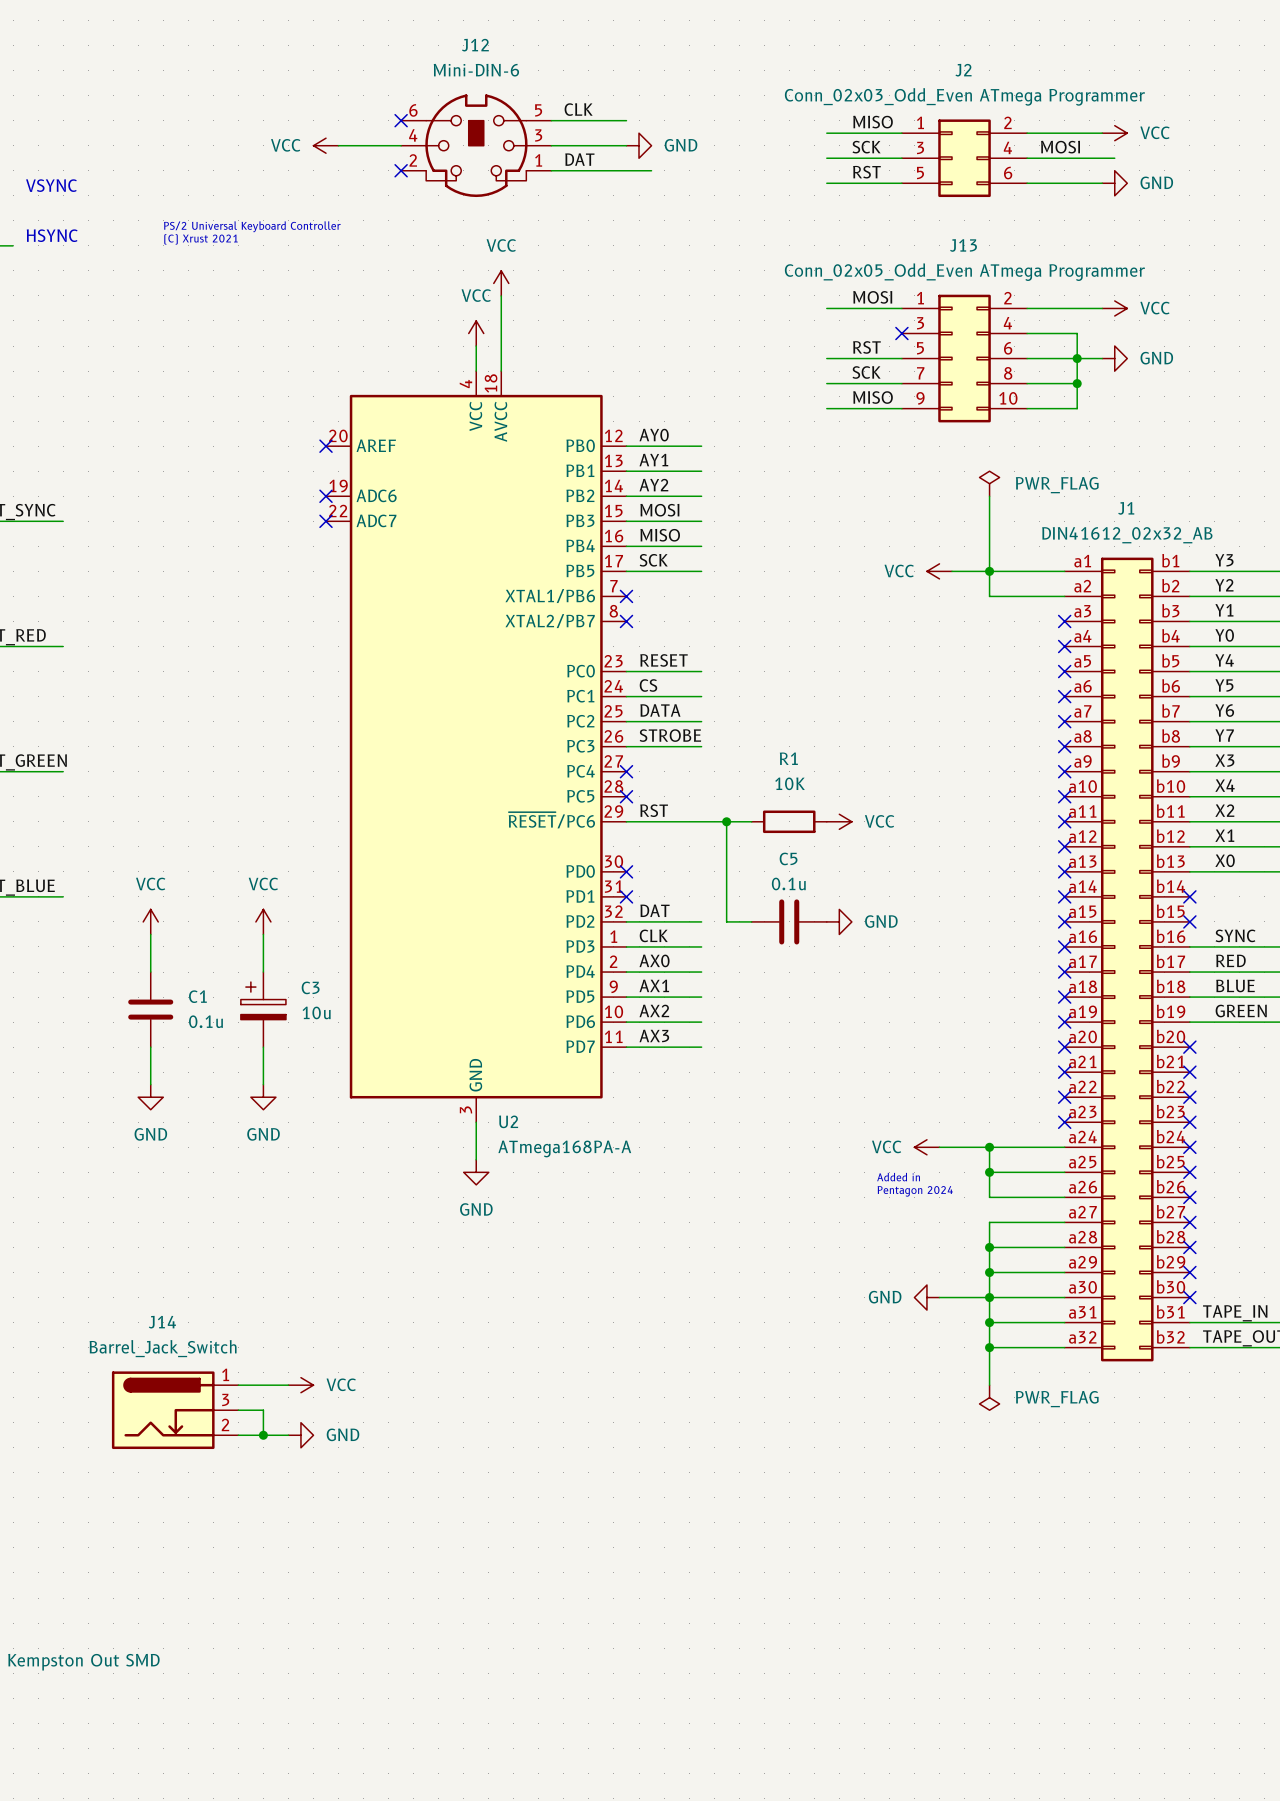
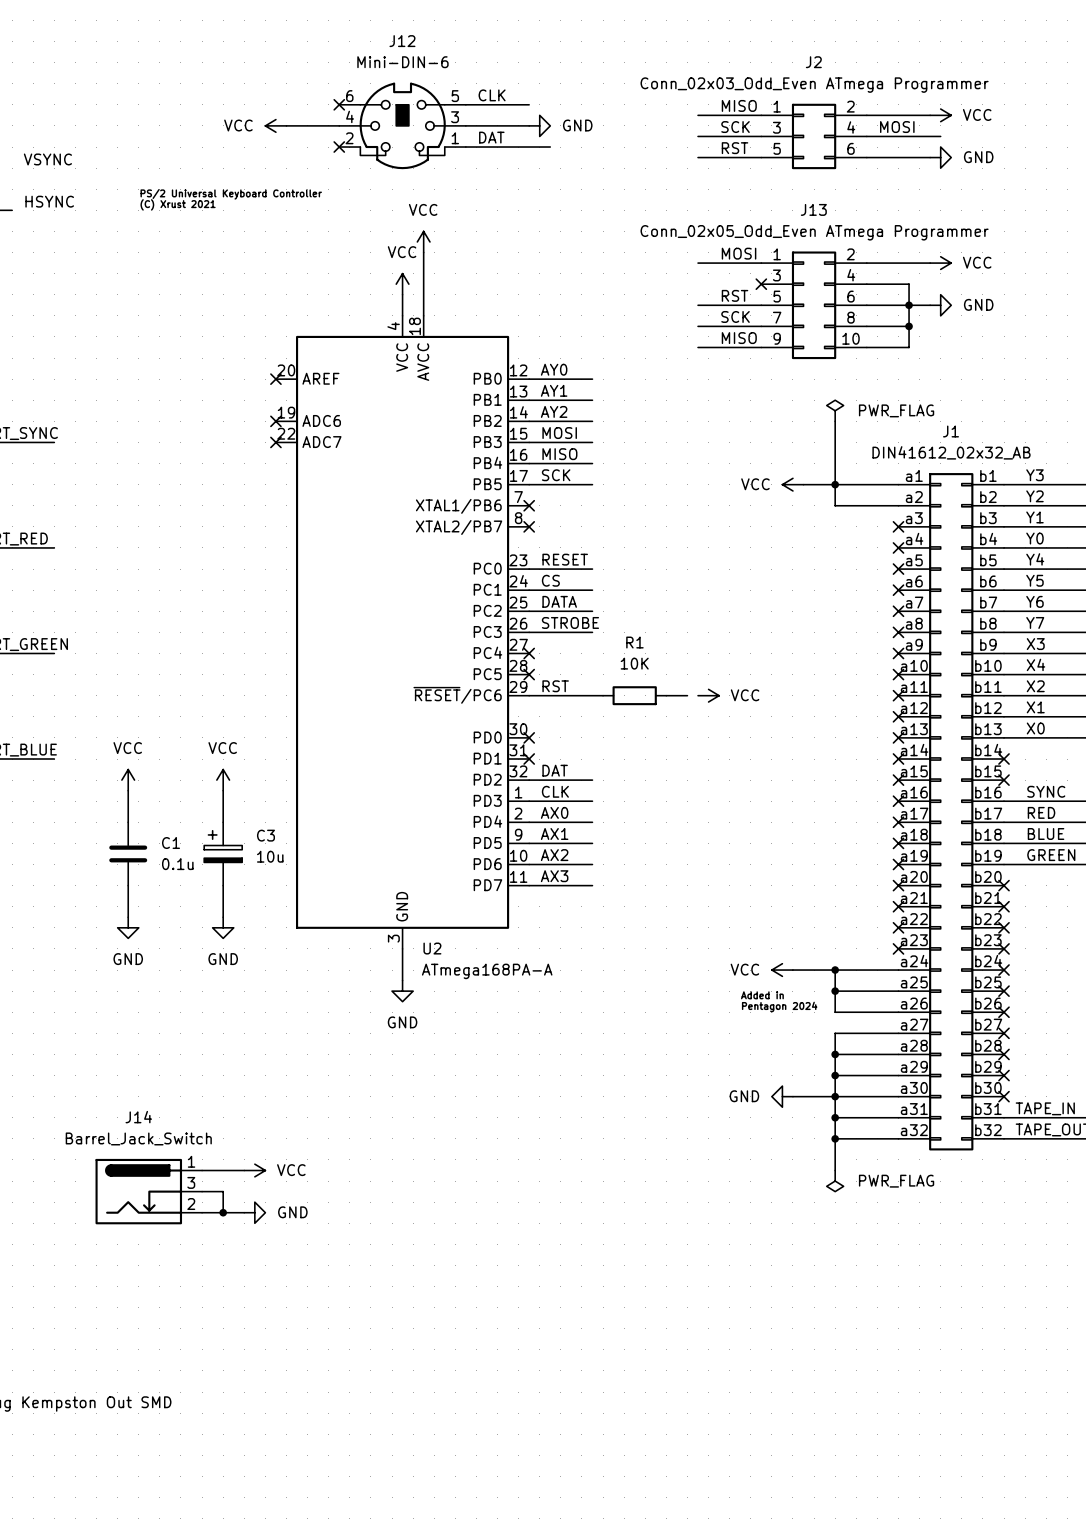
wire: (714, 821) (751, 821) -> none
wire: (726, 821) (726, 921) (751, 921) -> none
junction: (726, 821) -> none
wire: none -> (666, 695) (687, 695)
R1 position: (789, 821) -> (634, 695)
C5: 0.1u (789, 921) -> none
power symbol: GND (839, 921) -> none

